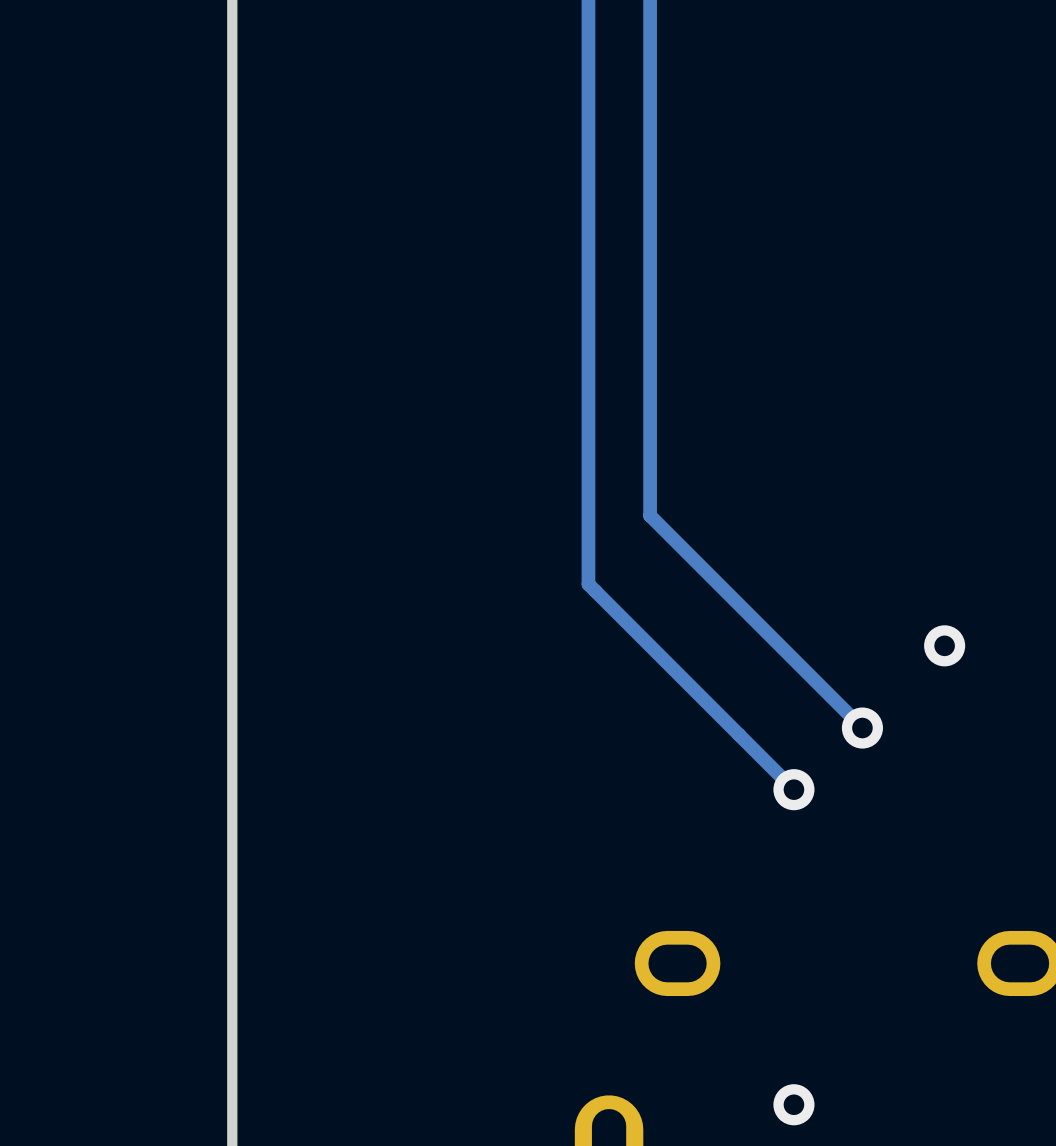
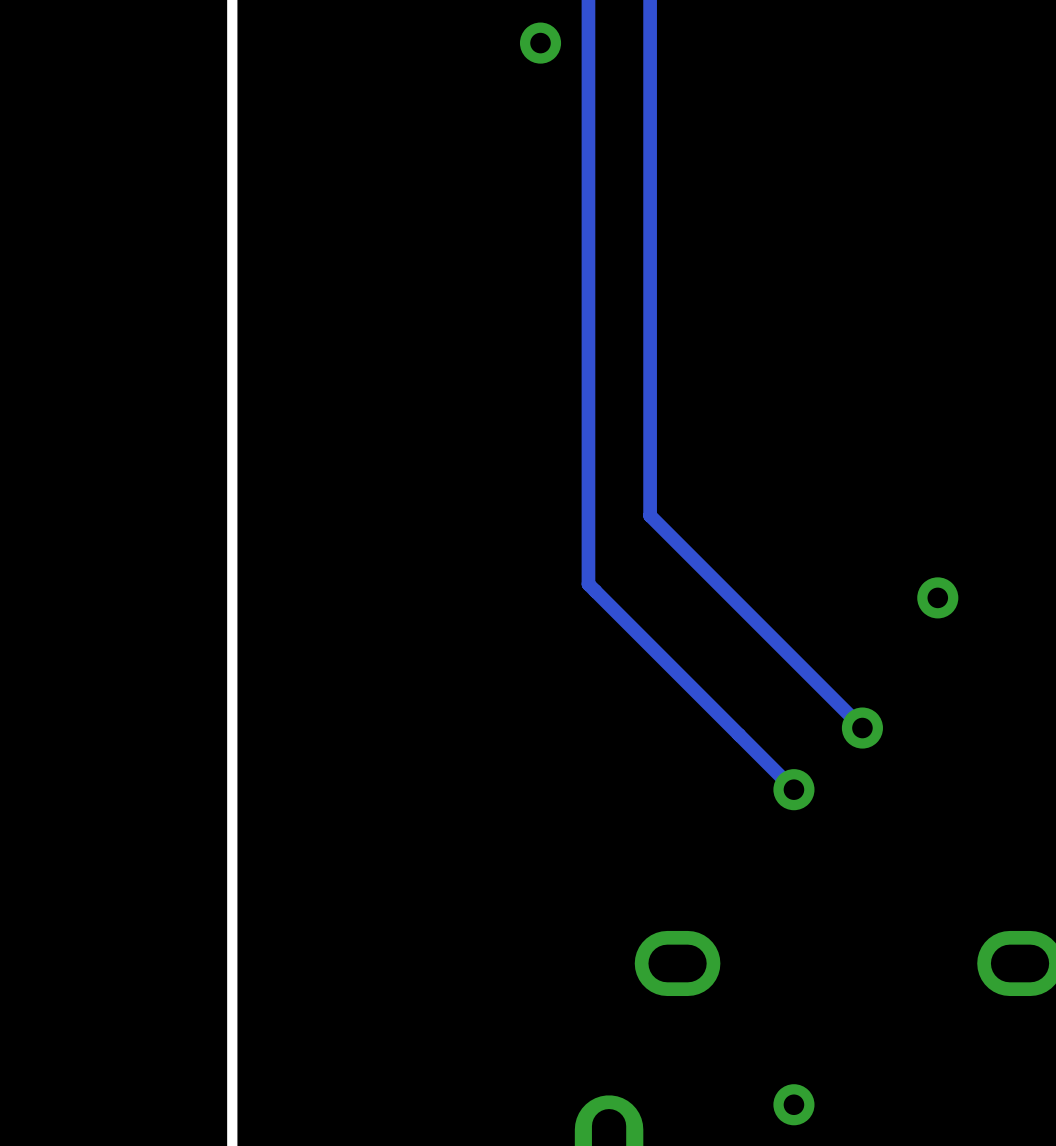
via: none -> (540, 43)
via position: (944, 645) -> (937, 597)

